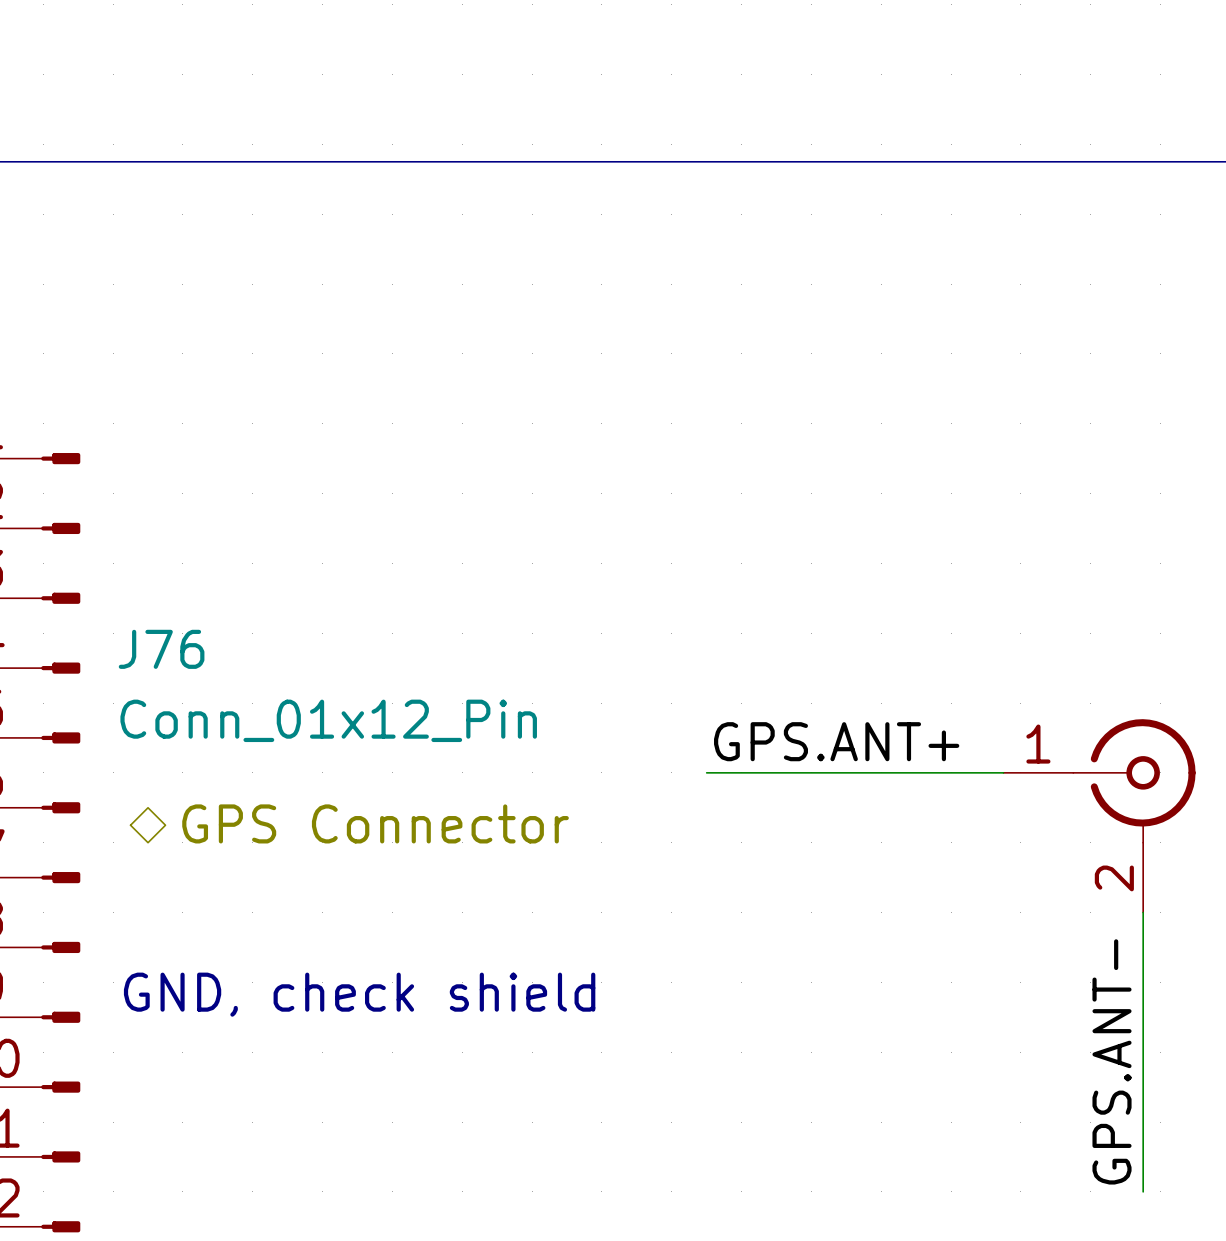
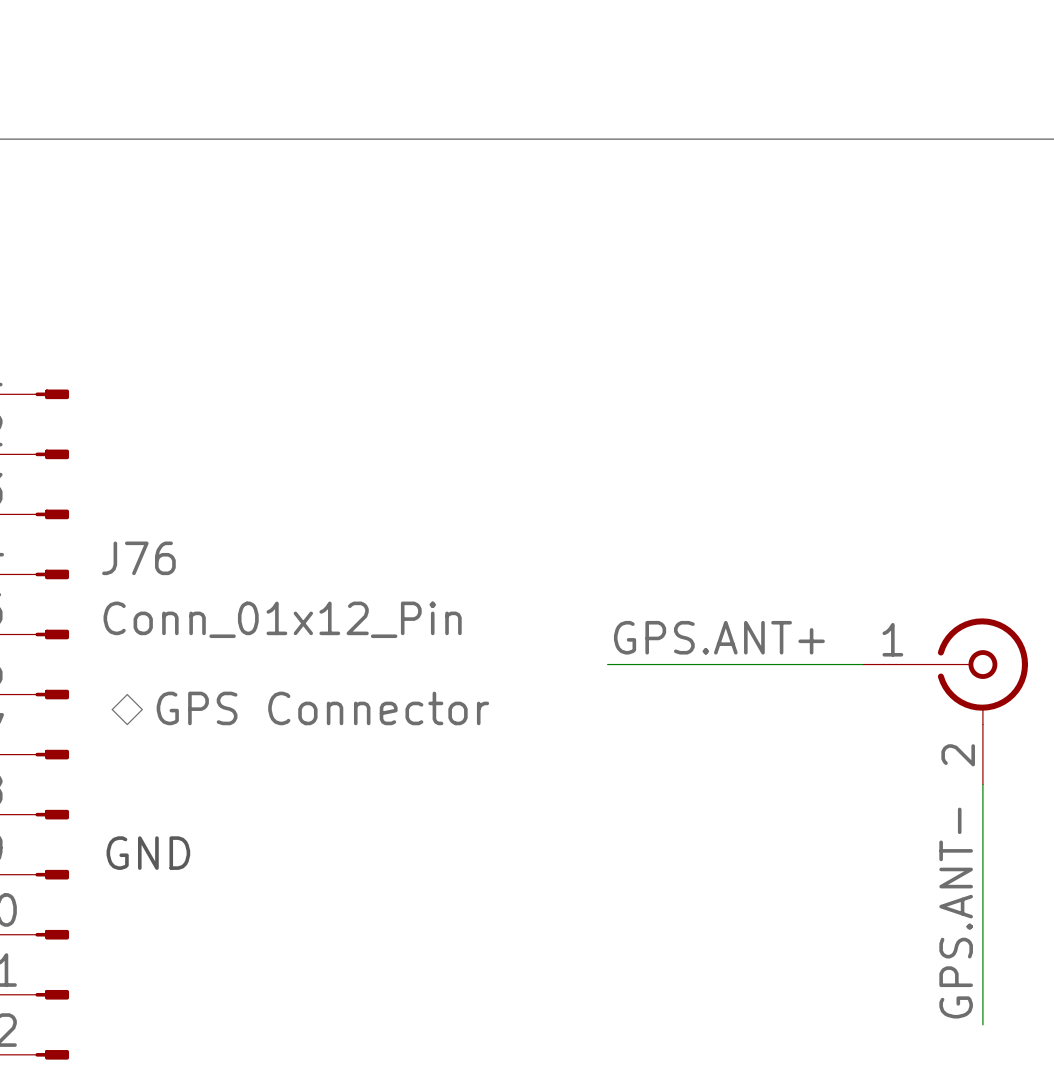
text: GND, check shield (359, 994) -> GND (148, 853)

